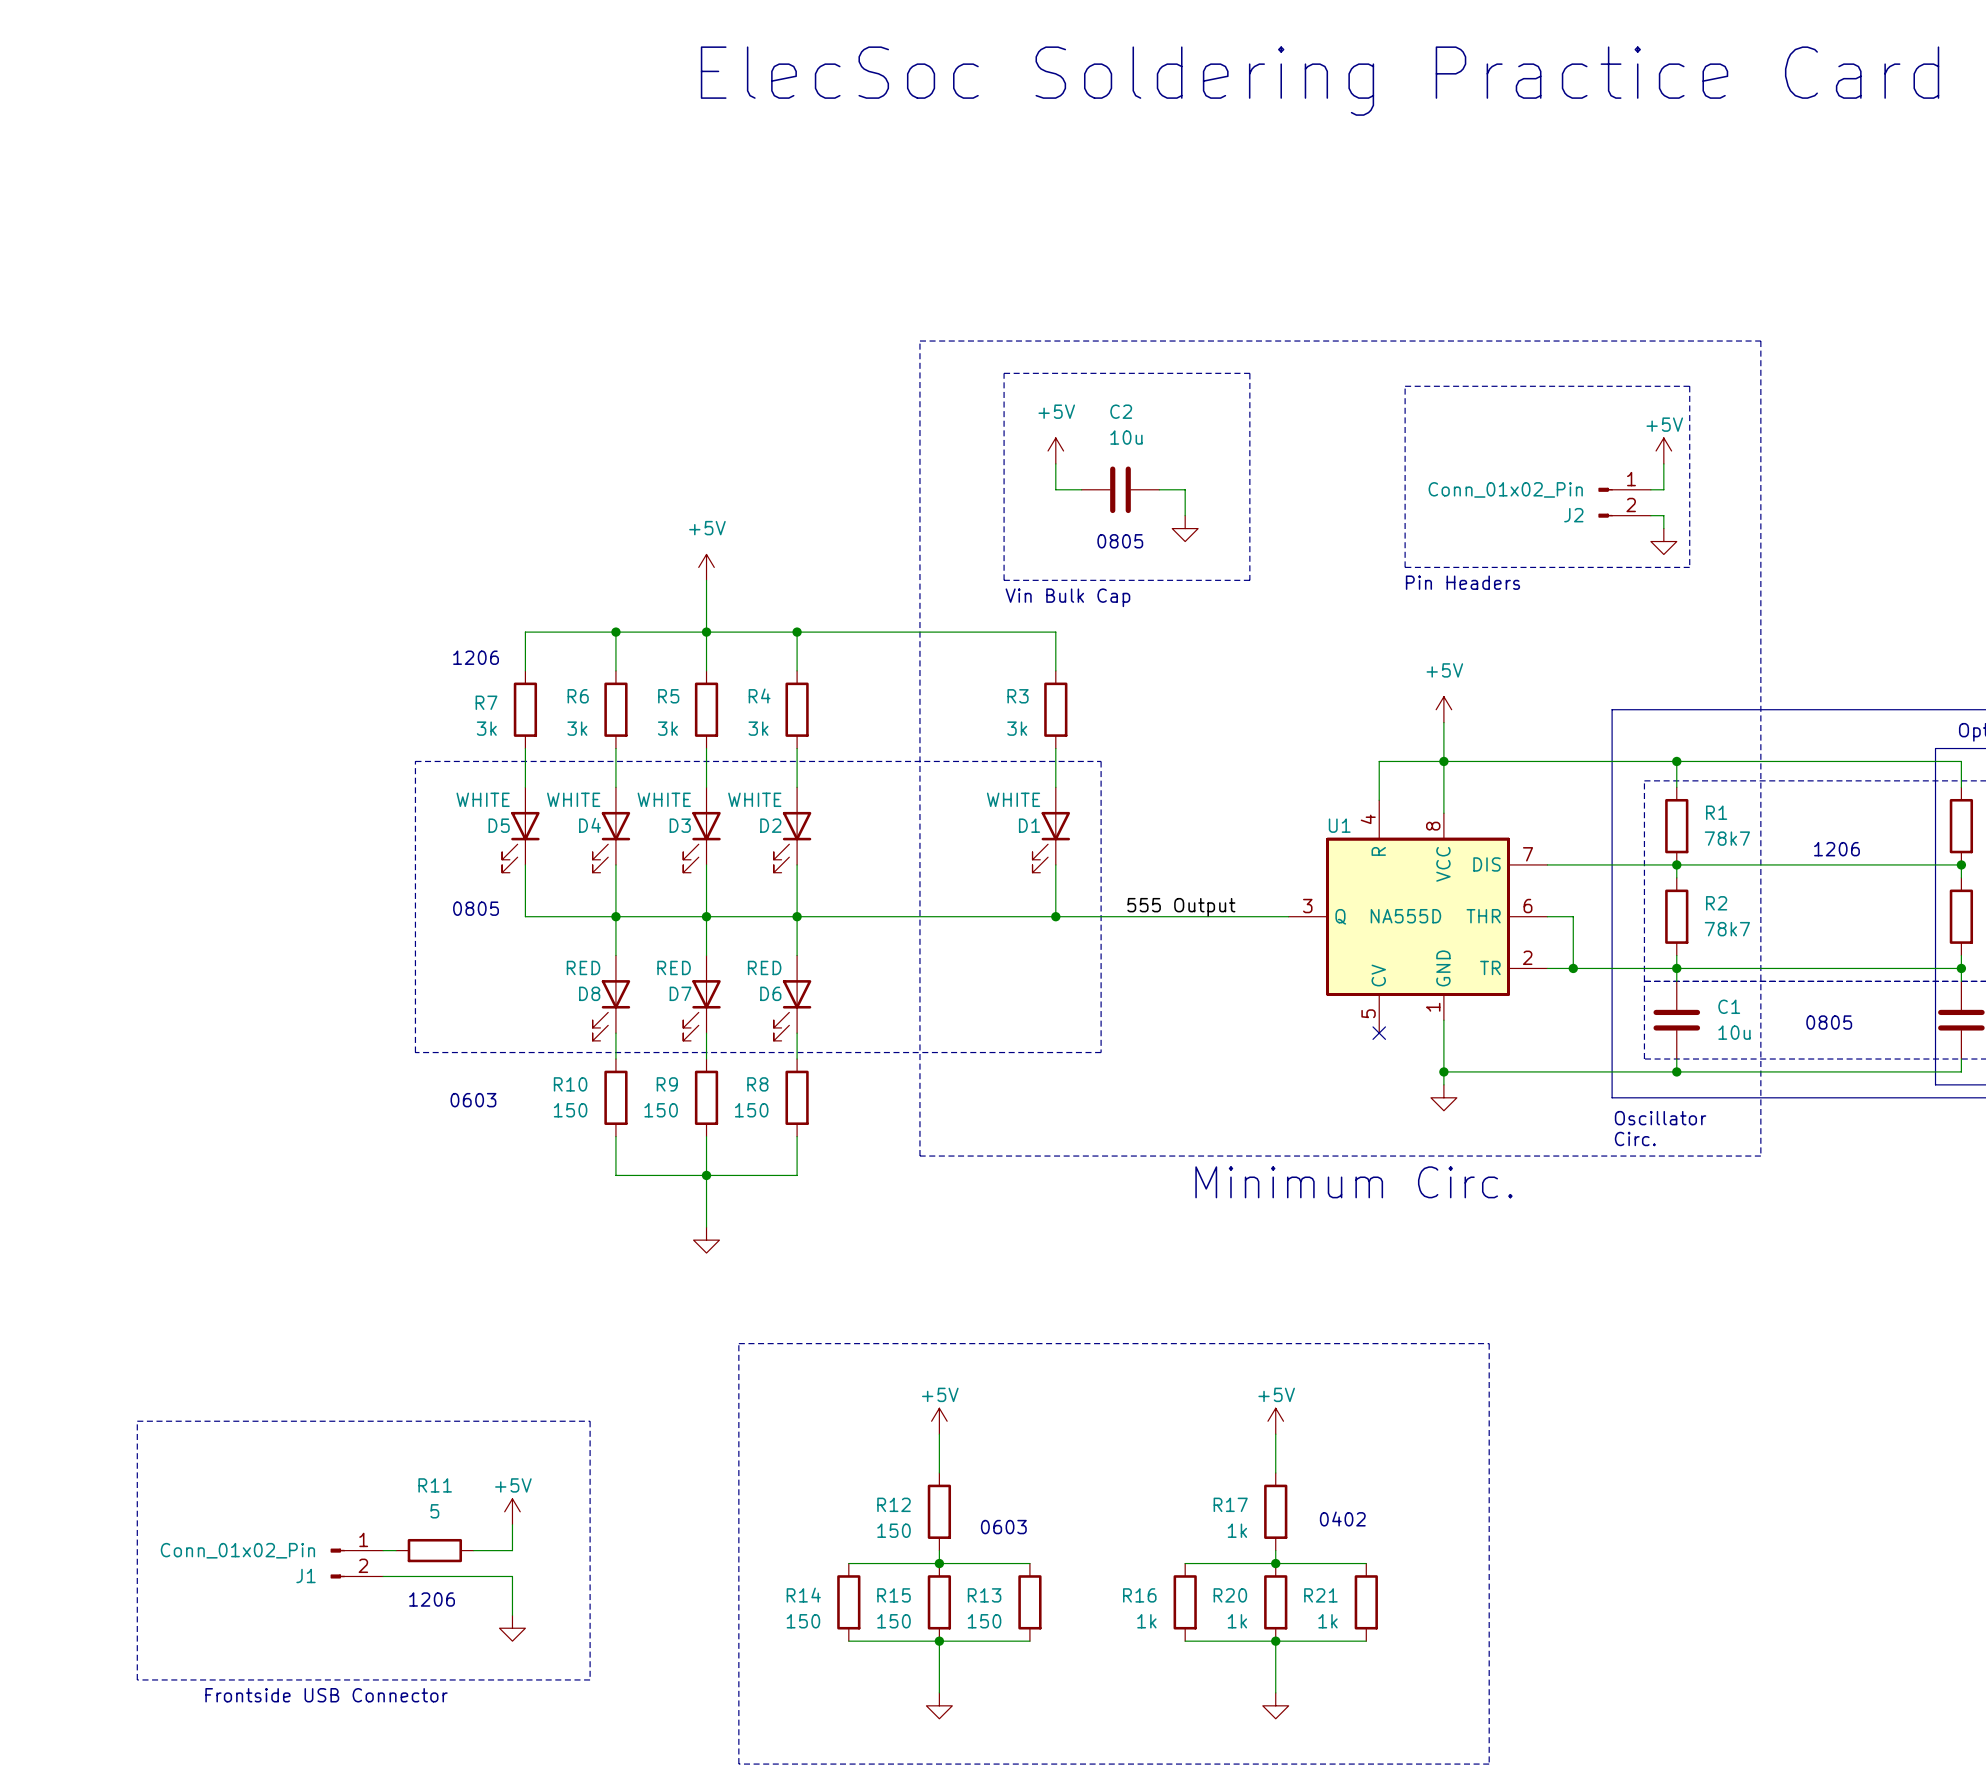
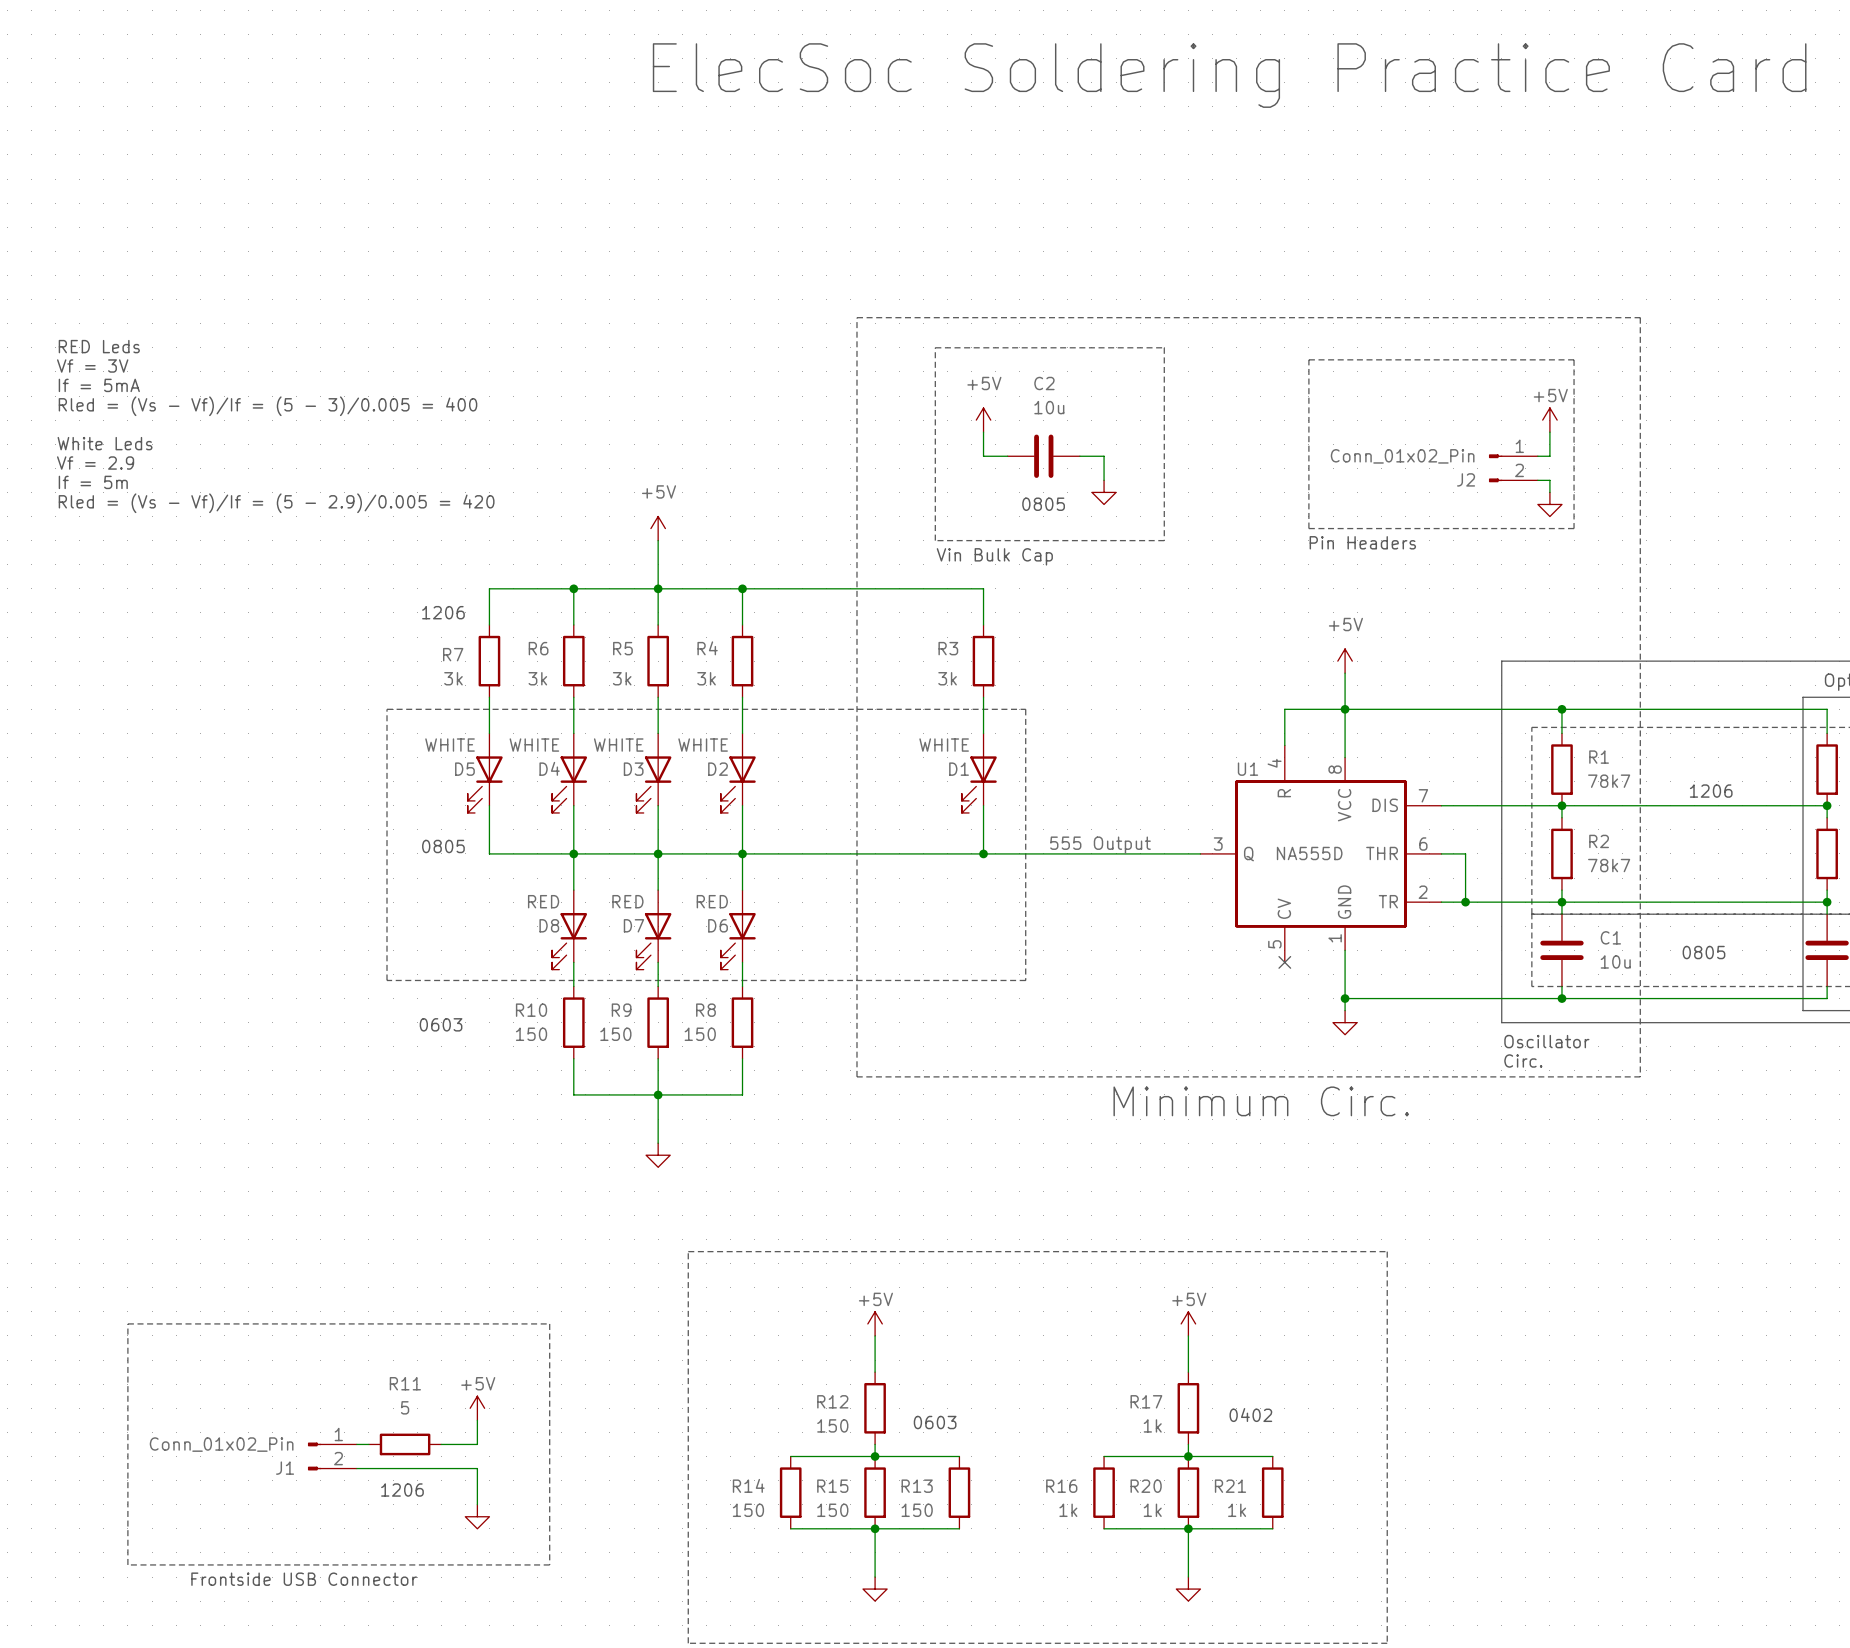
text: none -> RED Leds (99, 346)
text: none -> Vf = 3V (92, 366)
text: none -> If = 5mA (99, 385)
text: none -> Rled = (Vs - Vf)/If = (5 - 3)/0.005 = 400 (268, 406)
text: none -> White Leds (105, 443)
text: none -> Vf = 2.9 (95, 463)
text: none -> If = 5m (93, 482)
text: none -> Rled = (Vs - Vf)/If = (5 - 2.9)/0.005 = 420 (276, 503)

